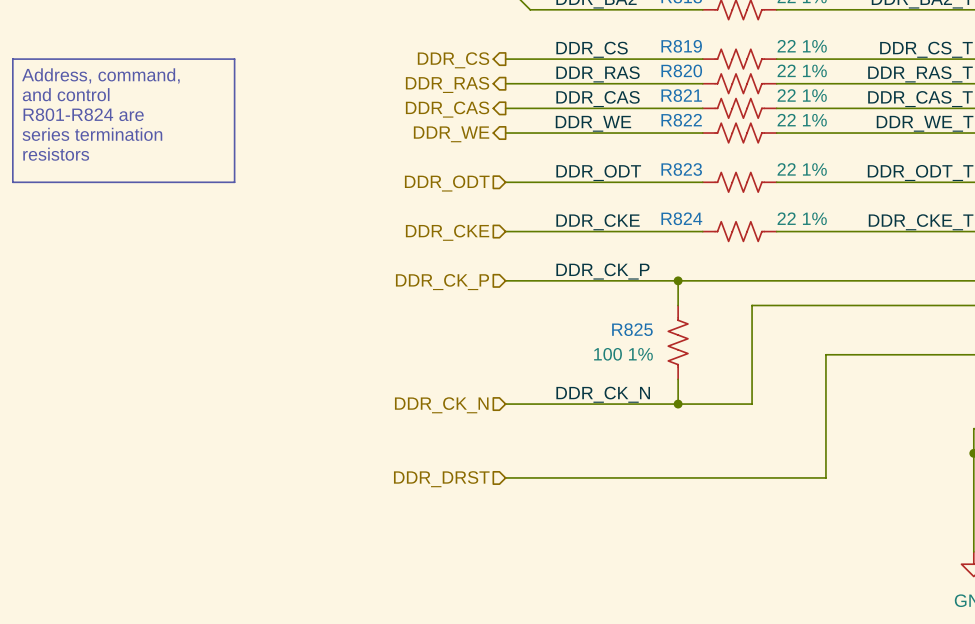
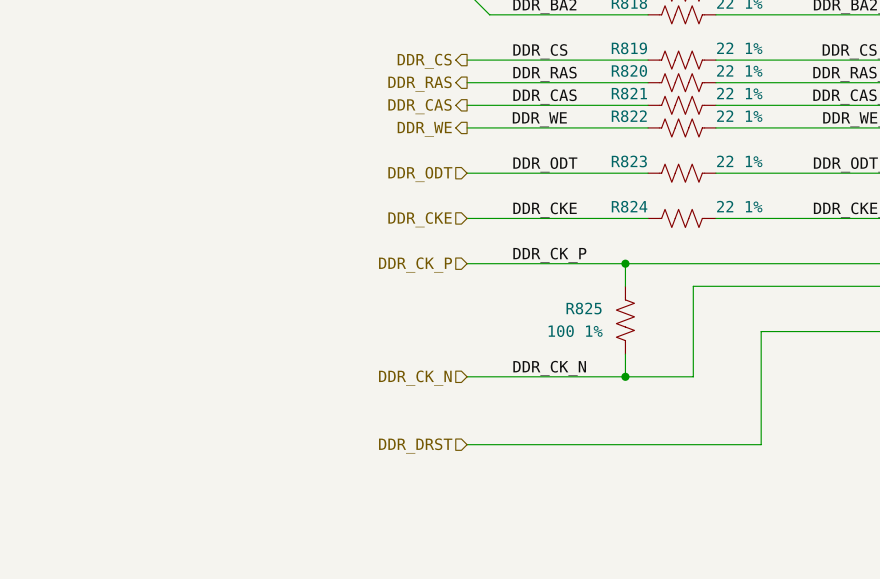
line: (12, 59) (234, 59) (234, 182) (12, 182) (12, 59) -> none
text: Address, command, (100, 75) -> none
text: and control (66, 94) -> none
text: R801-R824 are (83, 114) -> none
text: series termination (92, 134) -> none
text: resistors (56, 154) -> none

